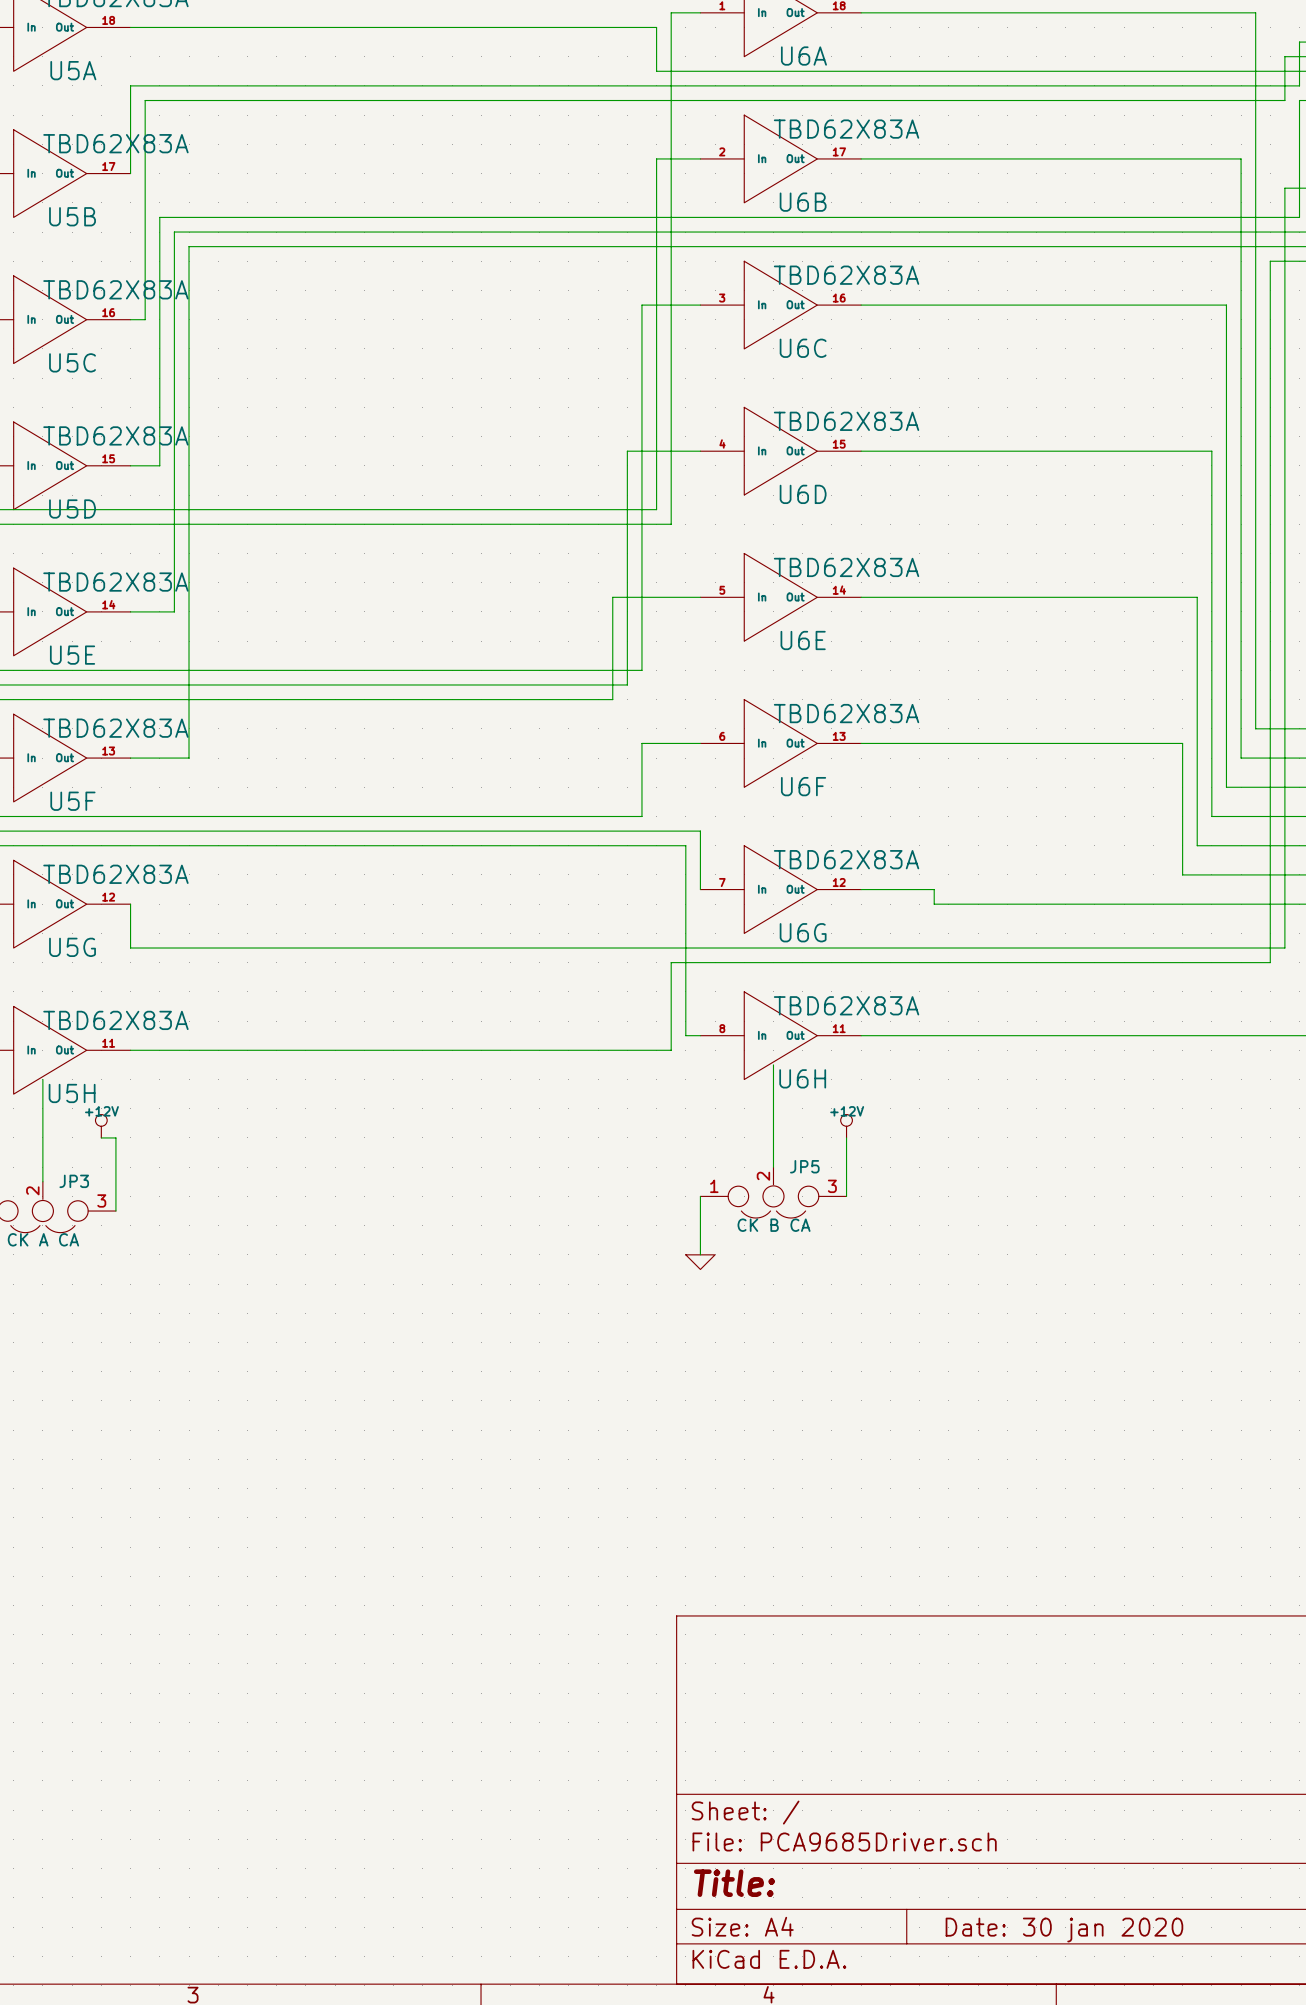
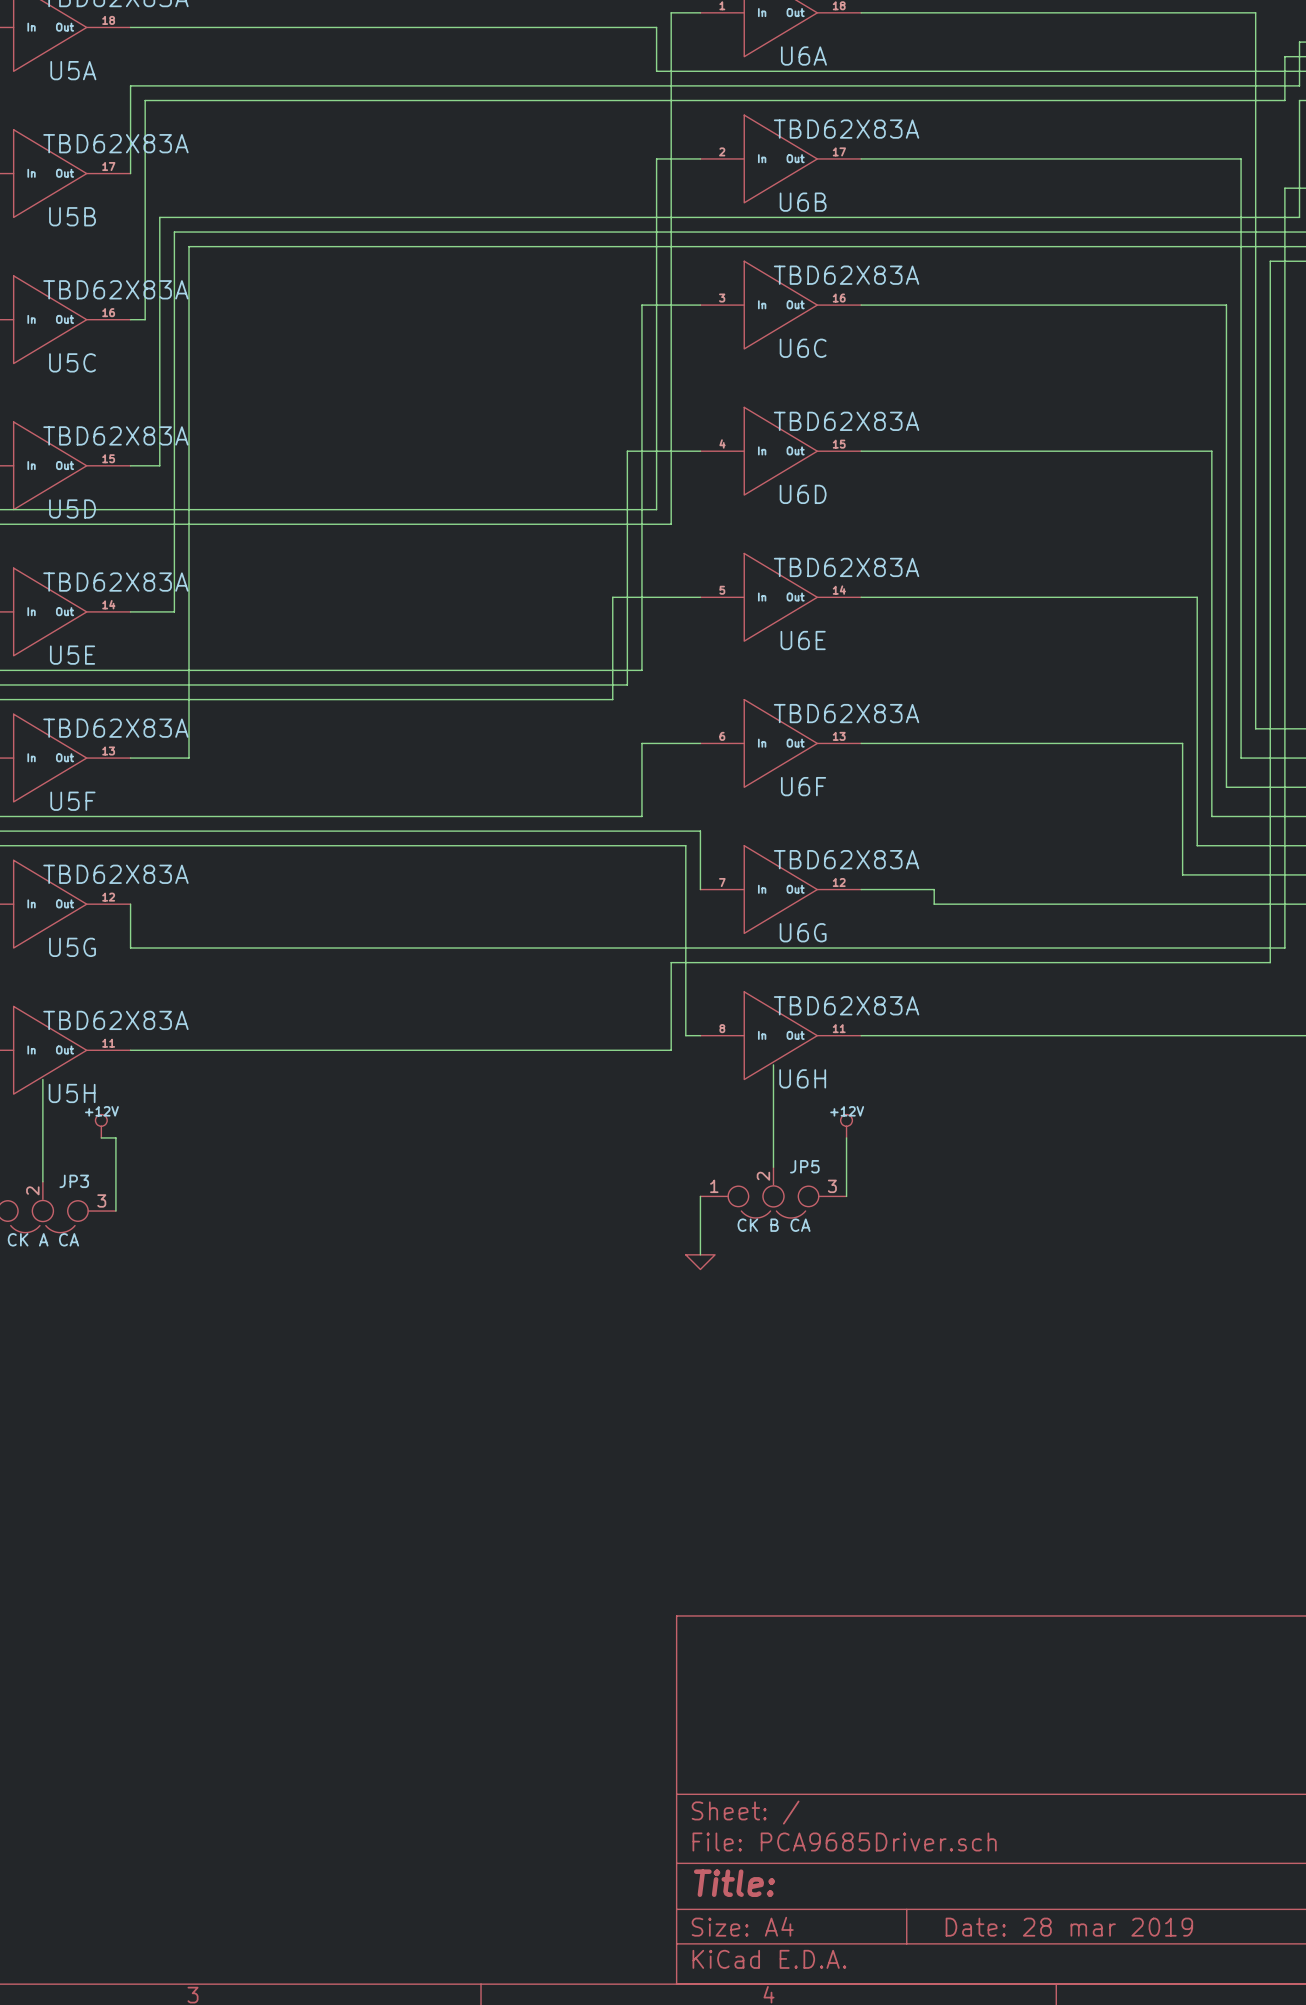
title block: Date: 30 jan 2020 (1064, 1930) -> Date: 28 mar 2019 (1069, 1927)

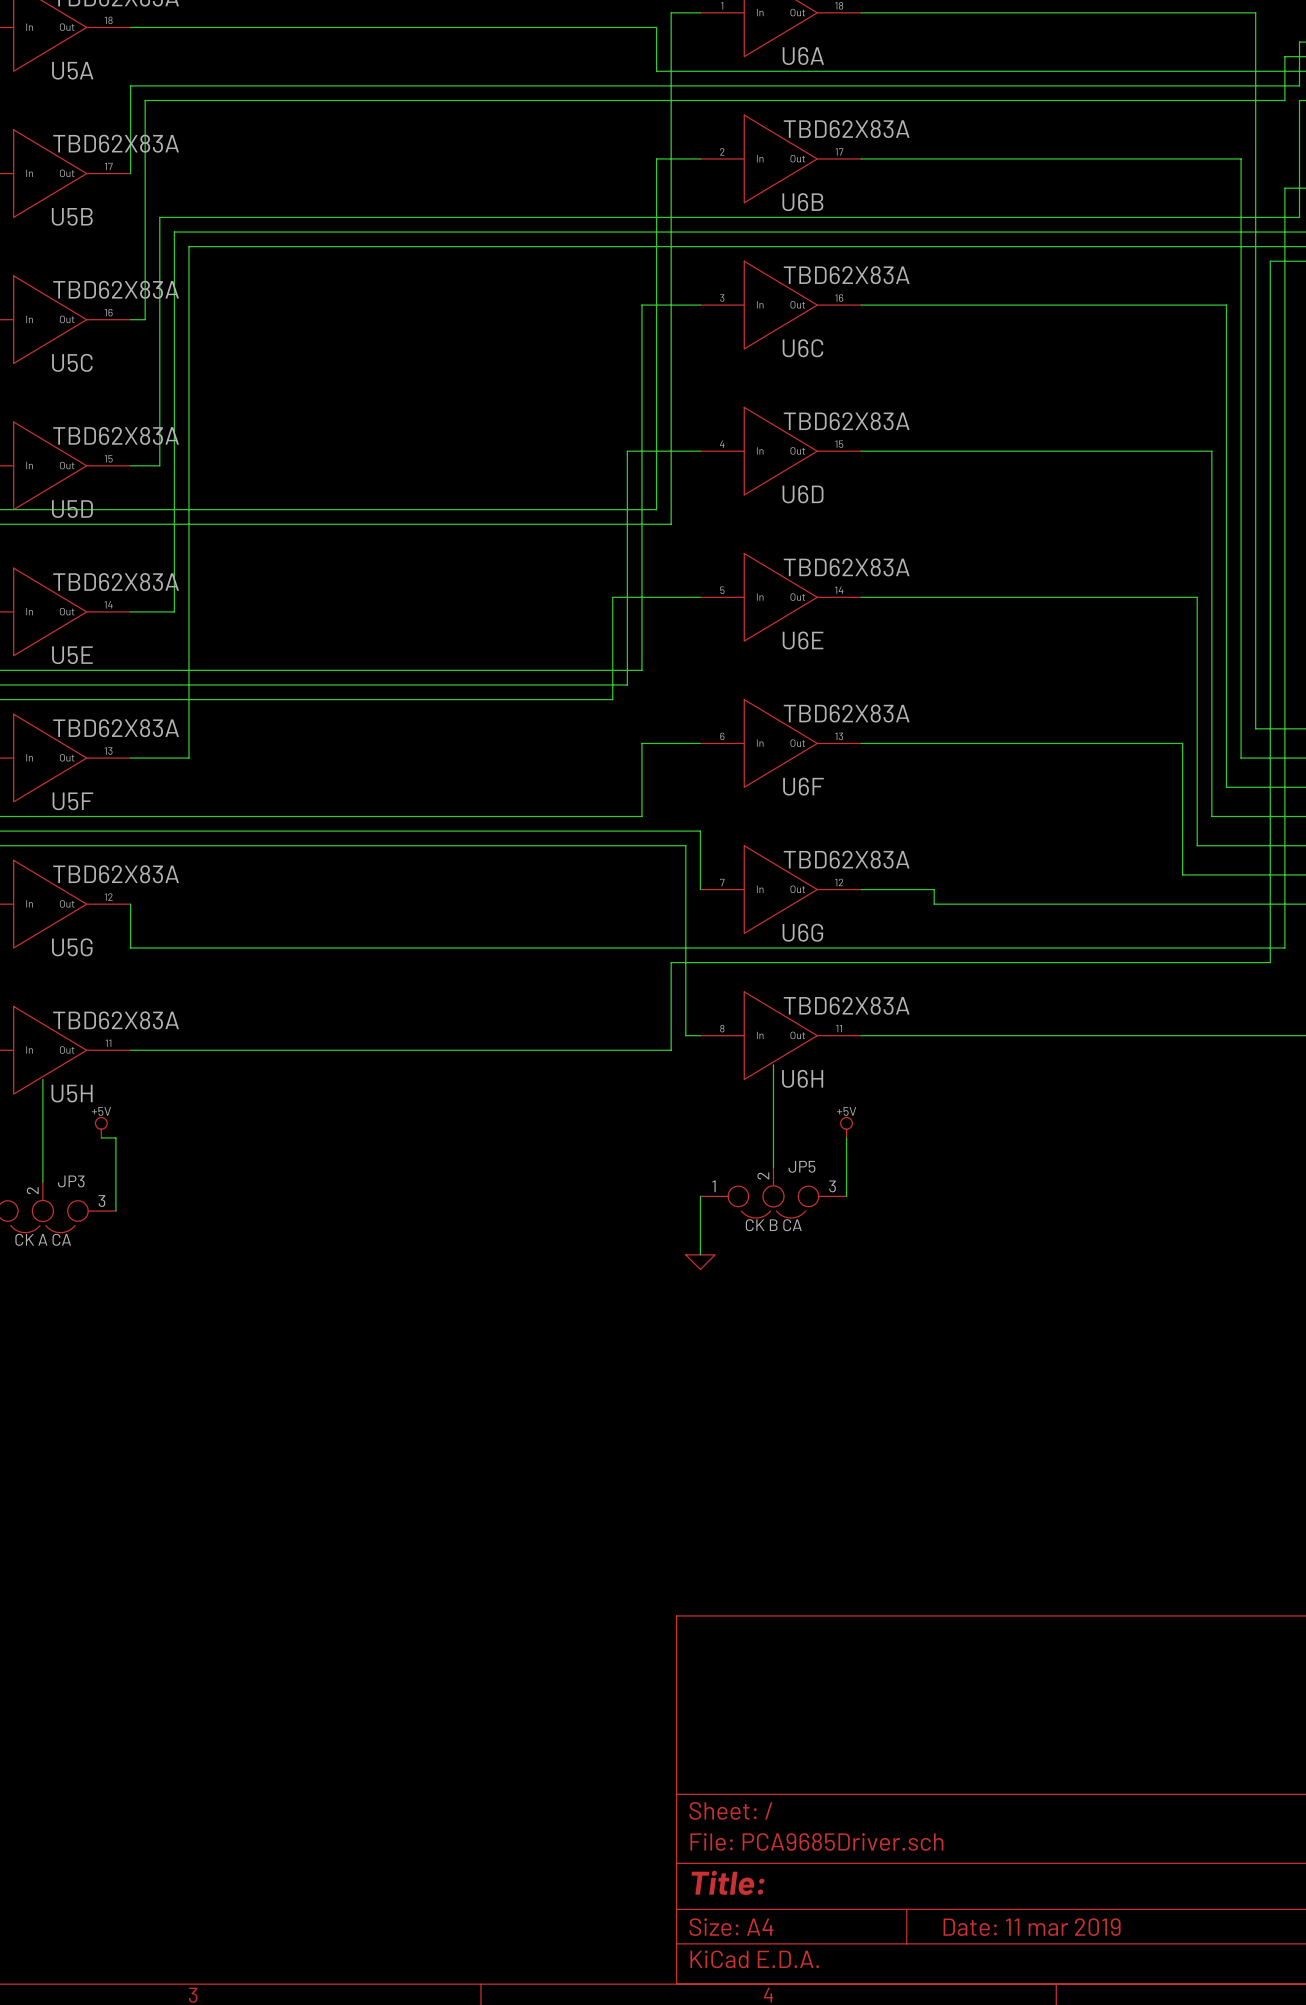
power symbol: +12V (101, 1126) -> +5V (101, 1127)
power symbol: +12V (846, 1126) -> +5V (846, 1127)
title block: Date: 28 mar 2019 (1069, 1927) -> Date: 11 mar 2019 (1032, 1927)

